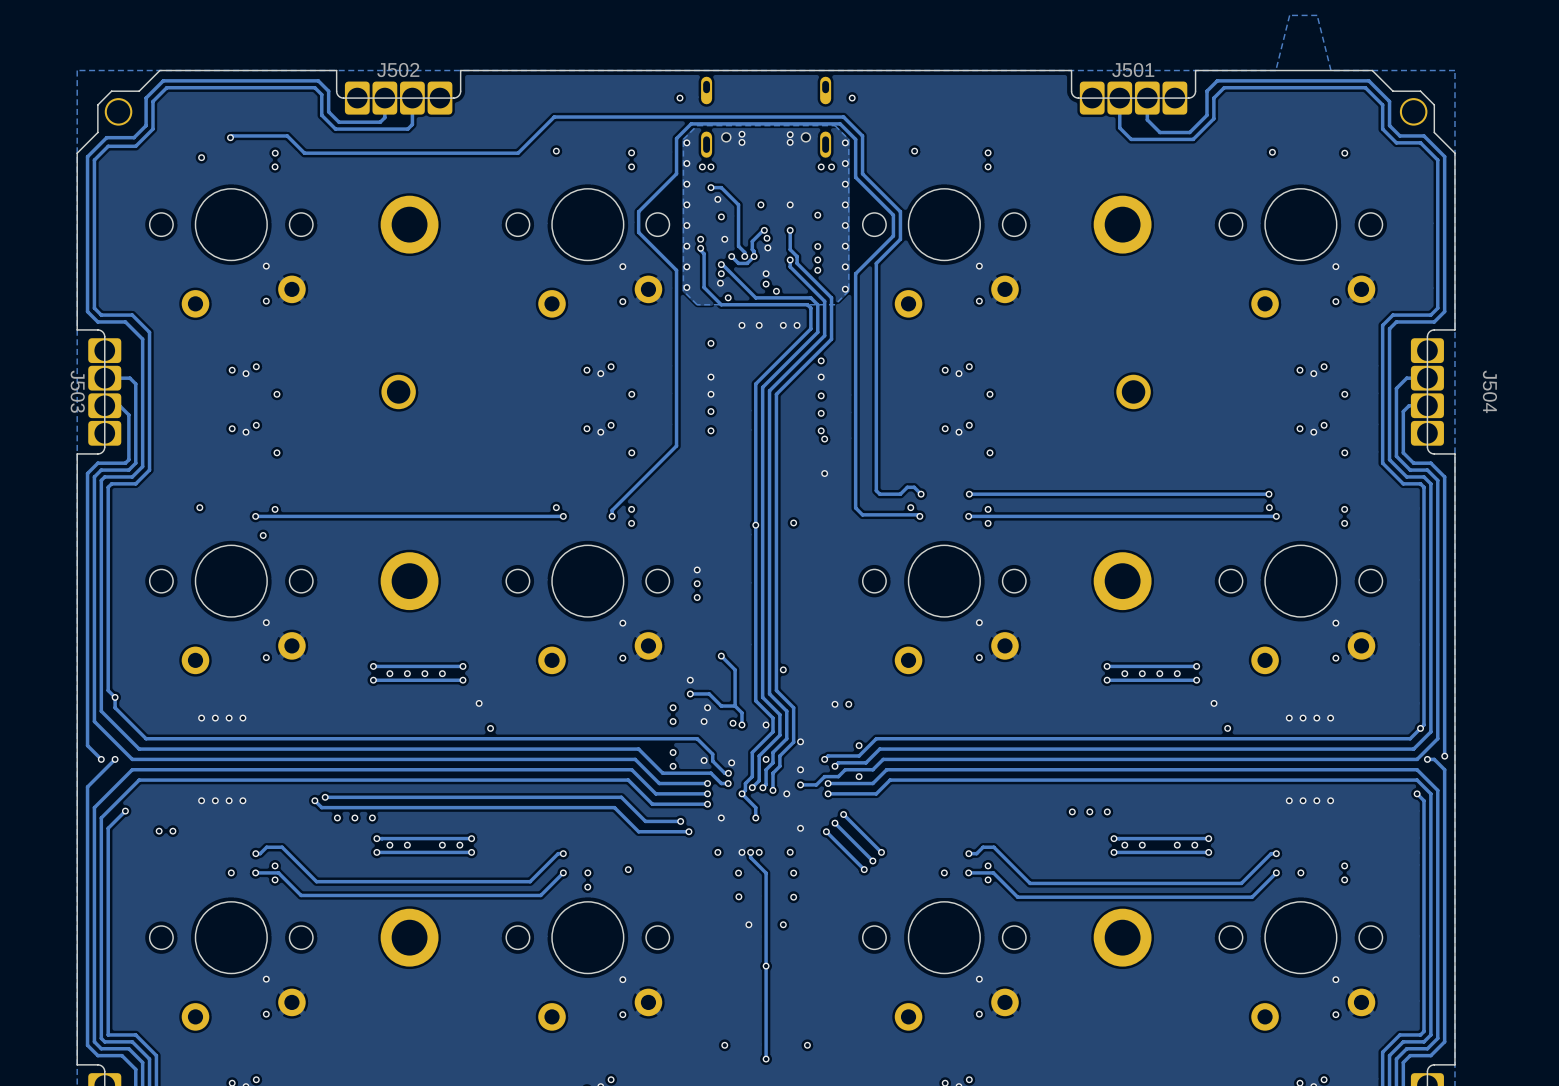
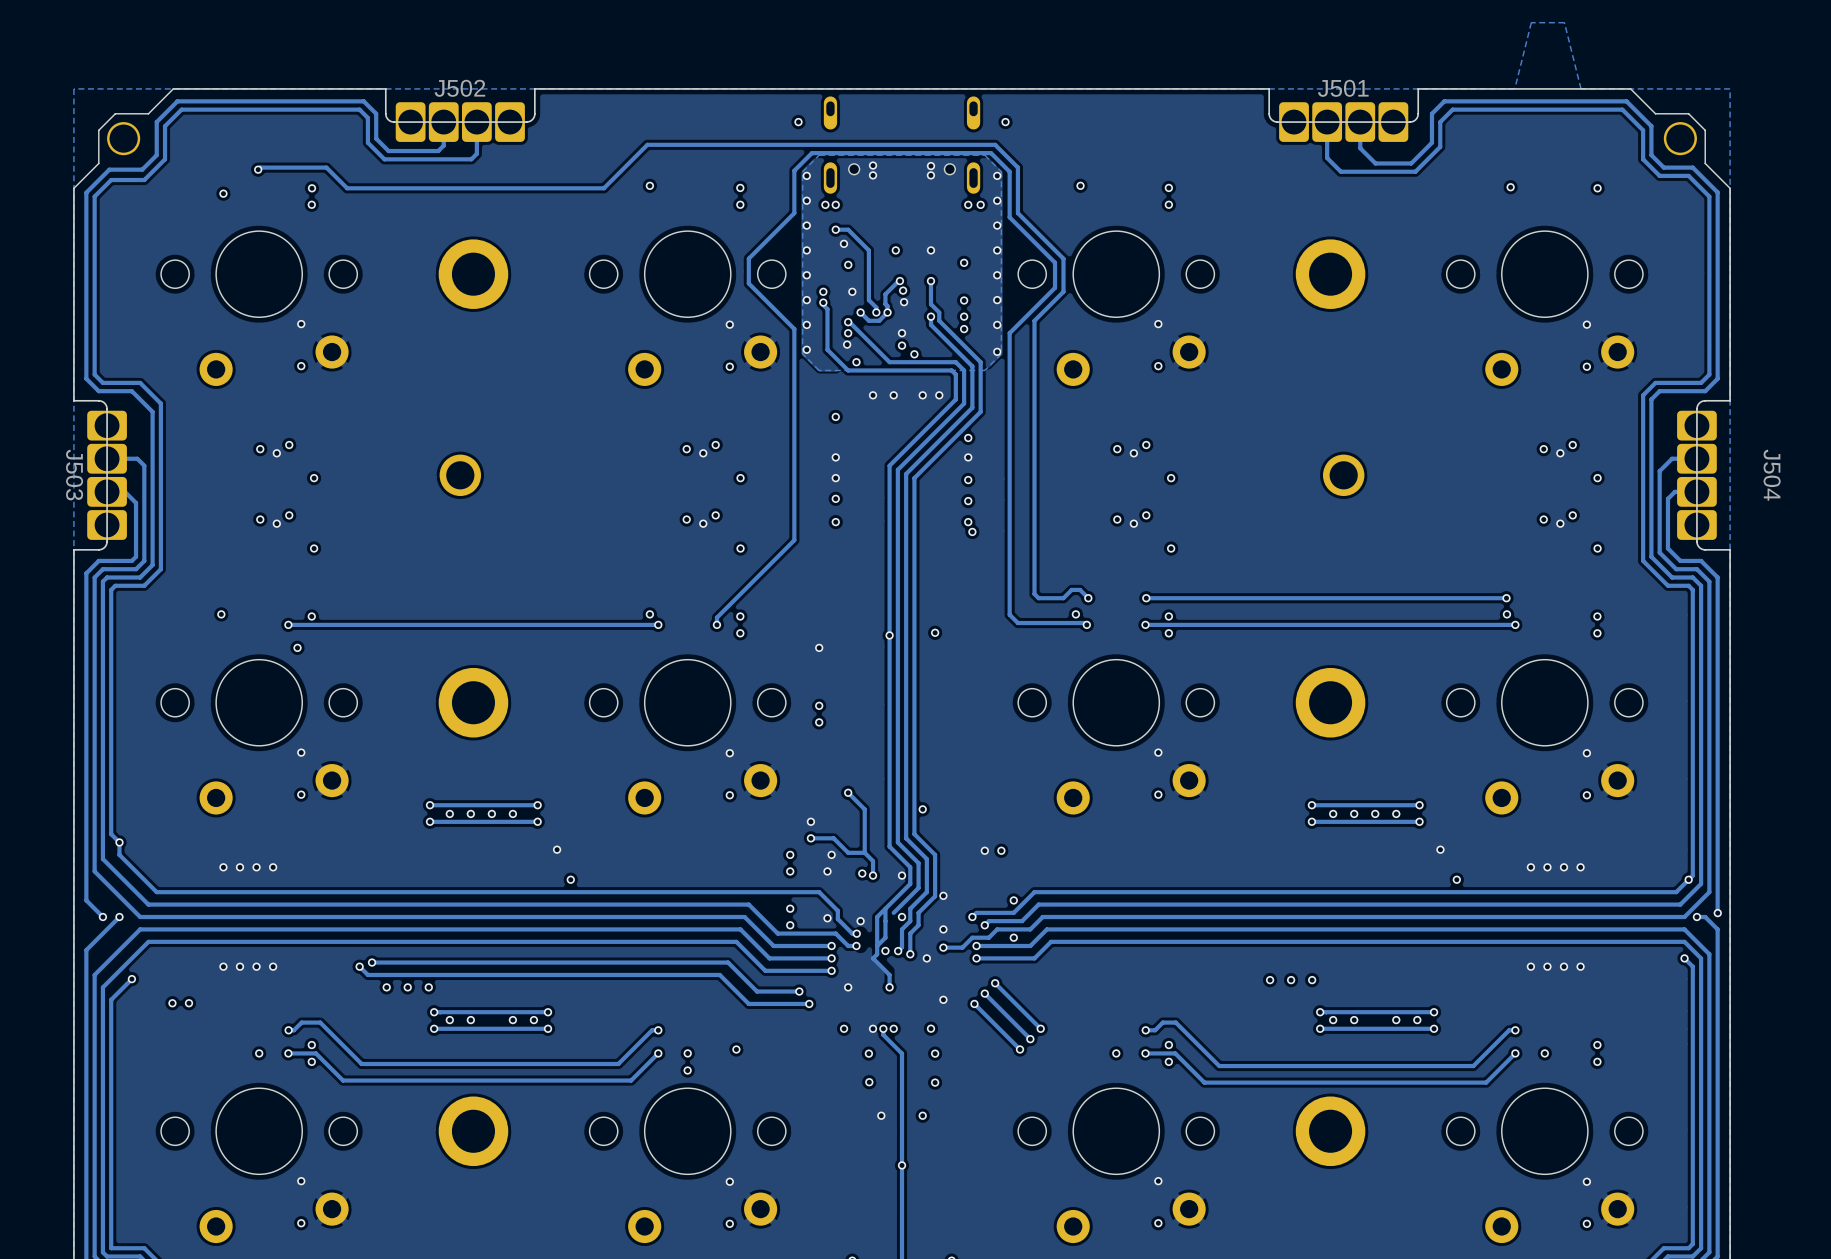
via: (824, 473) -> none
via position: (697, 569) -> (819, 647)
track: none -> (885, 908) (877, 917) (877, 945)
track: (759, 755) (759, 780) (752, 787) -> none
via: (741, 793) -> none

